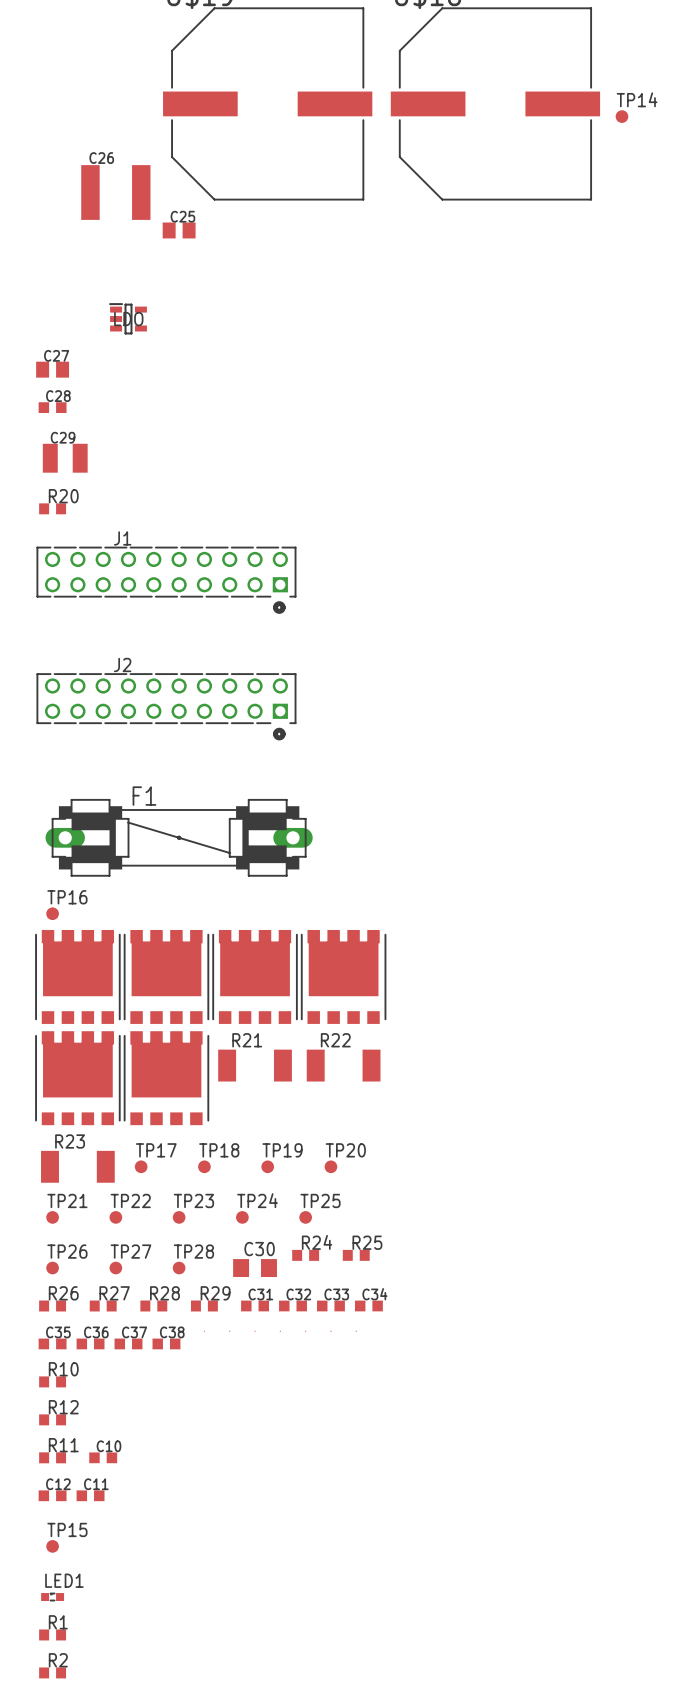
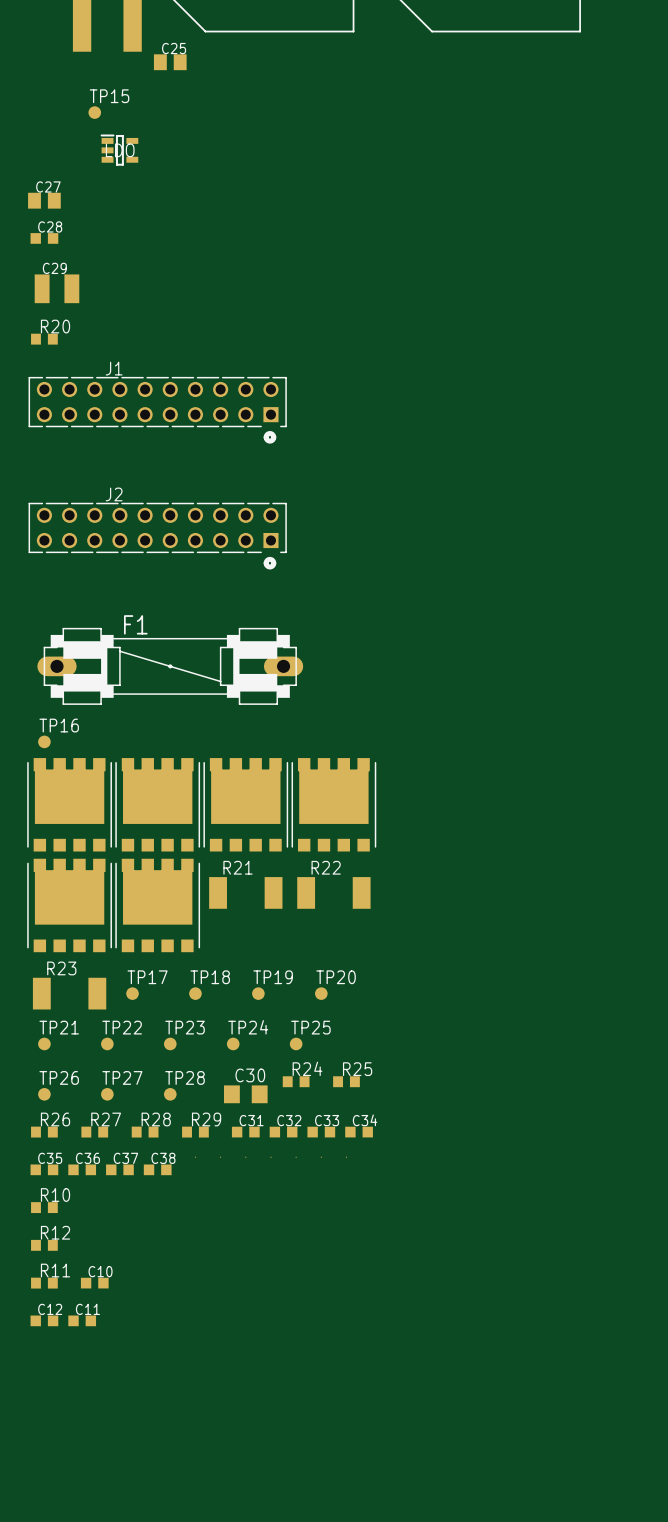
TP15 position: (52, 1546) -> (94, 112)
LED1: (52, 1597) -> none
R1: (52, 1634) -> none
R2: (52, 1672) -> none

